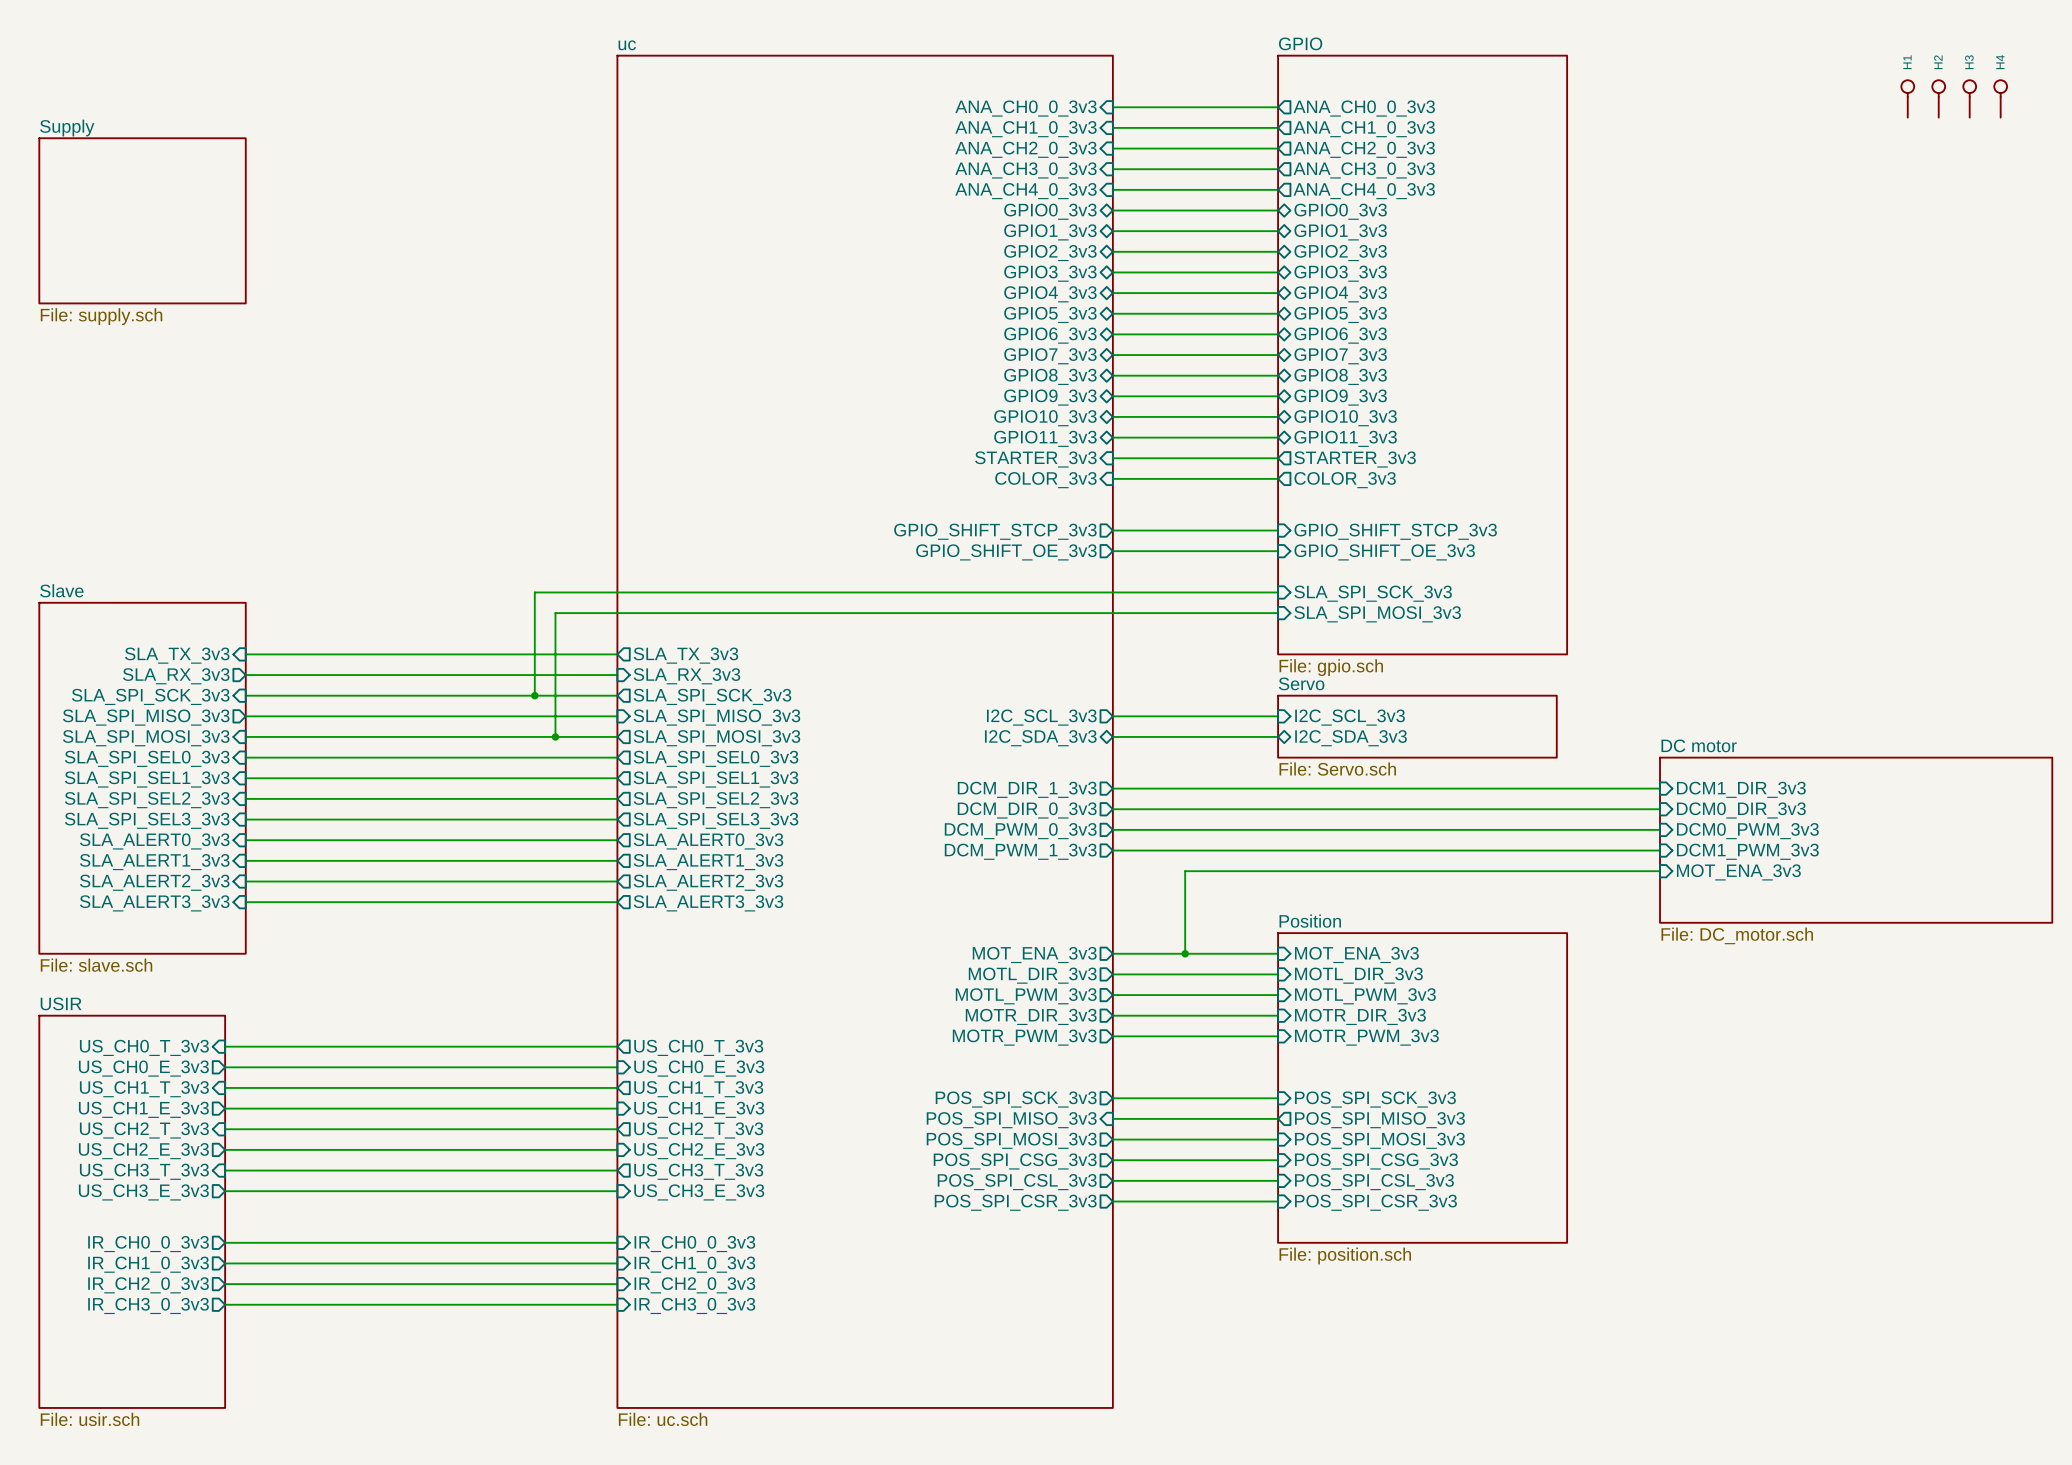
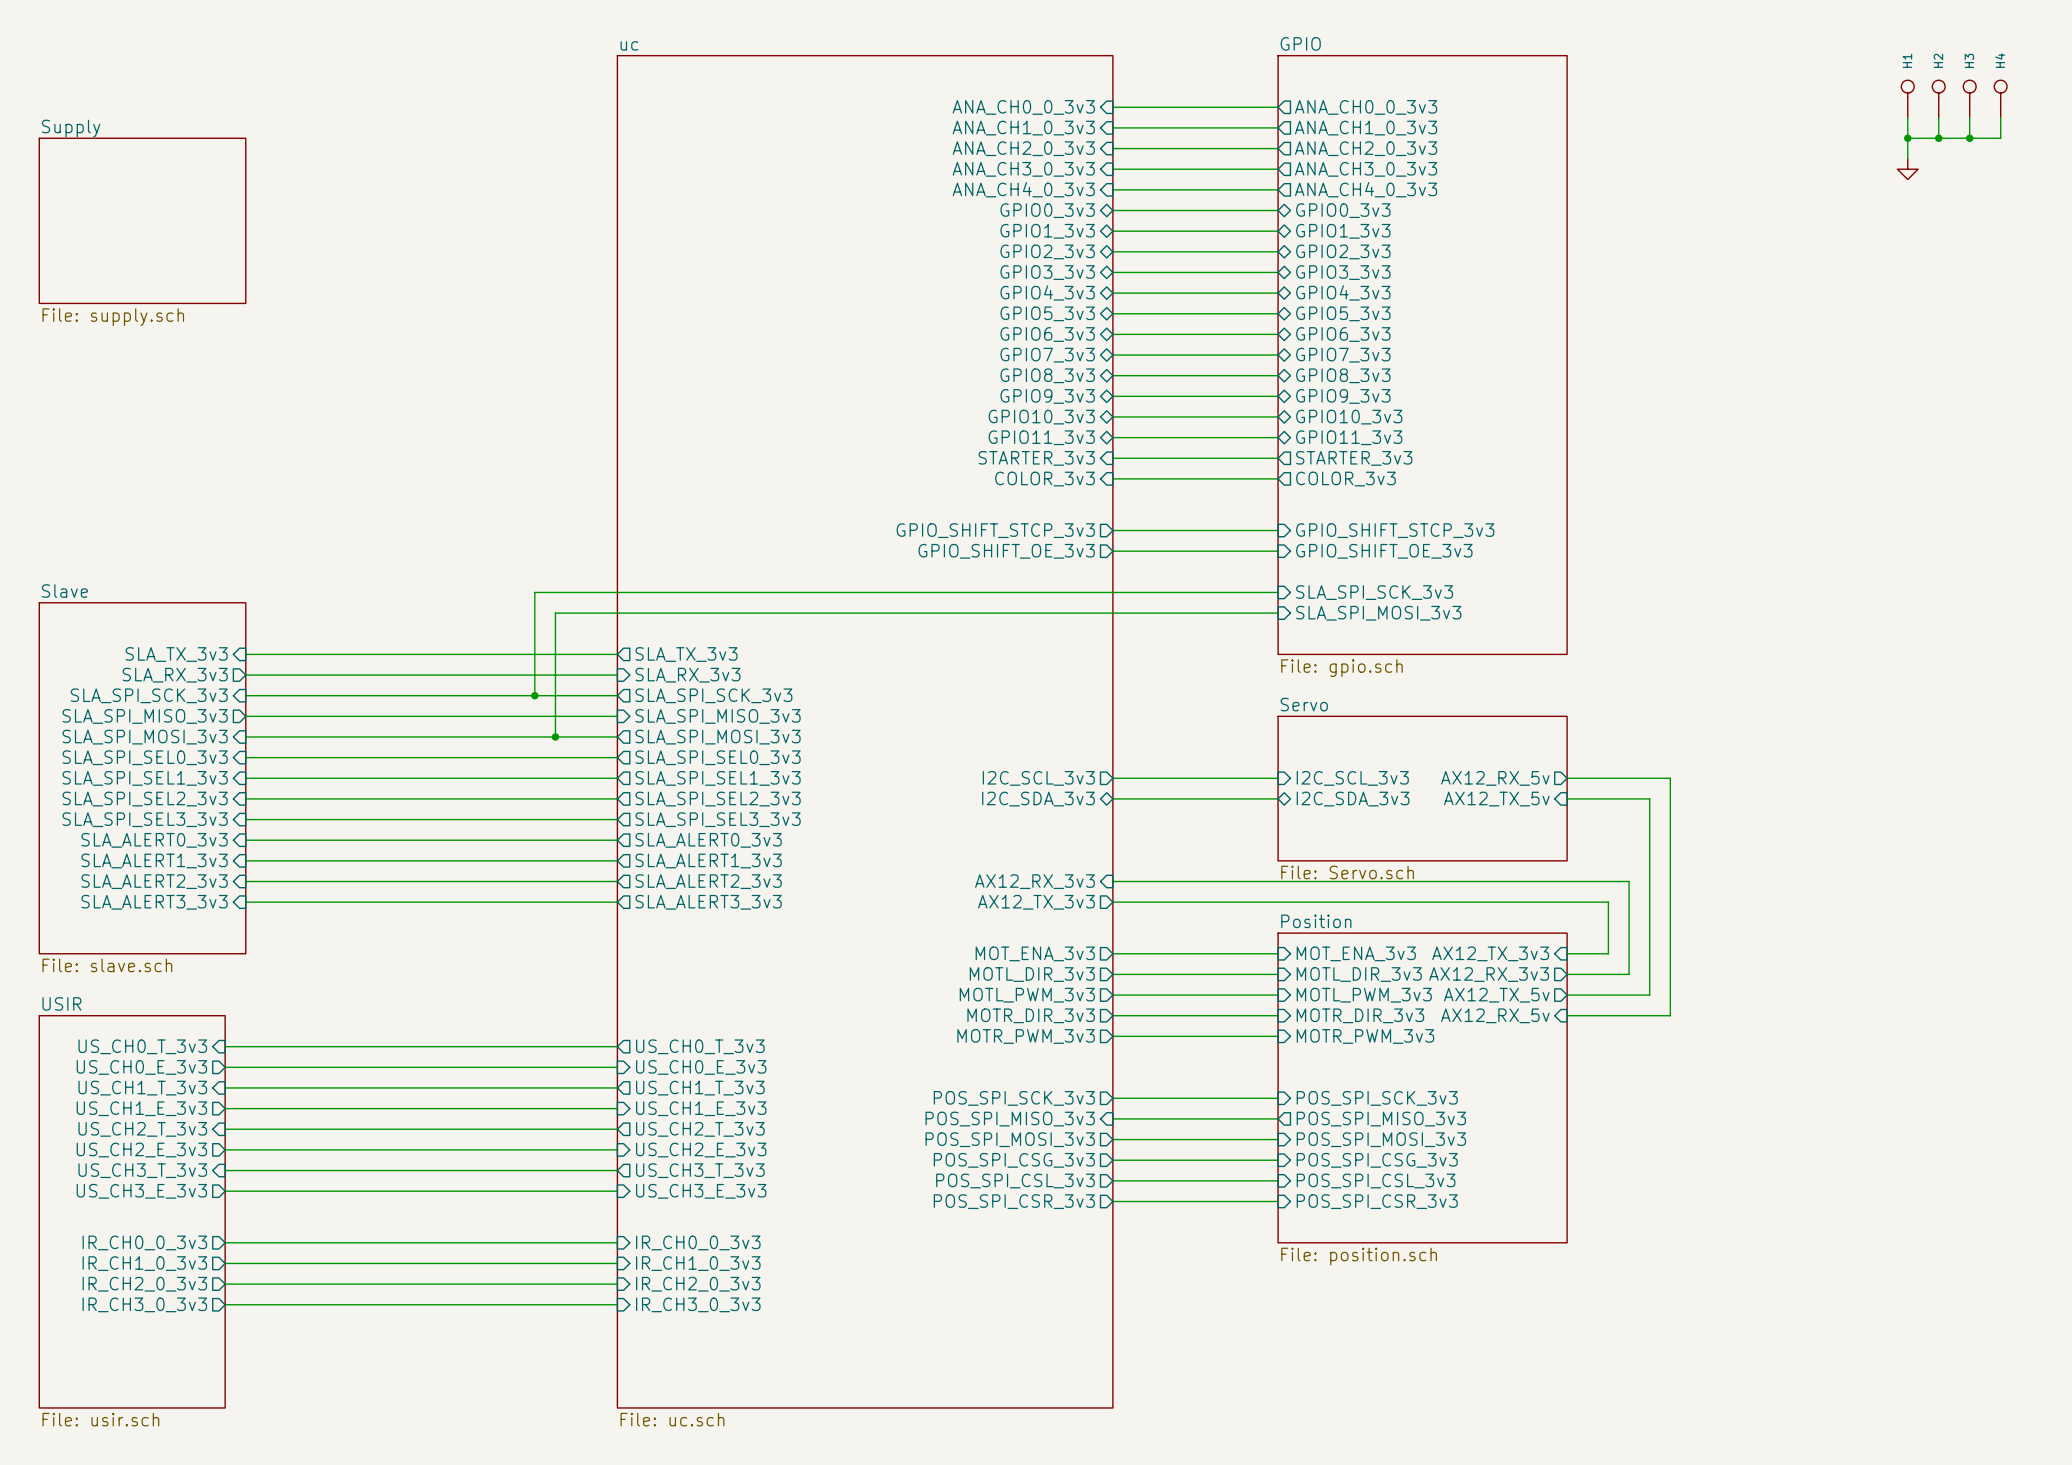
wire: none -> (1907, 117) (1907, 158)
wire: none -> (1938, 117) (1938, 138)
wire: none -> (1969, 117) (1969, 138)
wire: none -> (2000, 117) (2000, 138) (1907, 138)
junction: none -> (1907, 138)
junction: none -> (1938, 138)
junction: none -> (1969, 138)
power symbol: none -> (1907, 169)
wire: (1112, 716) (1278, 716) -> (1112, 778) (1278, 778)
sheet pin position: I2C_SCL_3v3 (1041, 717) -> I2C_SCL_3v3 (1038, 778)
sheet pin position: I2C_SCL_3v3 (1350, 717) -> I2C_SCL_3v3 (1352, 778)
sheet Servo: File: Servo.sch (1417, 726) -> none
wire: (1112, 736) (1278, 736) -> (1112, 798) (1278, 798)
sheet pin position: I2C_SDA_3v3 (1040, 738) -> I2C_SDA_3v3 (1038, 799)
sheet pin position: I2C_SDA_3v3 (1351, 738) -> I2C_SDA_3v3 (1353, 799)
wire: none -> (1567, 778) (1670, 778) (1670, 1015) (1567, 1015)
sheet pin: none -> AX12_RX_5v (1495, 778)
wire: (1112, 788) (1660, 788) -> none
sheet Servo: none -> File: Servo.sch (1422, 788)
sheet pin: DCM_DIR_1_3v3 (1027, 789) -> none
sheet pin: DCM1_DIR_3v3 (1741, 789) -> none
wire: none -> (1567, 798) (1649, 798) (1649, 995) (1567, 995)
sheet pin: none -> AX12_TX_5v (1496, 799)
wire: (1112, 809) (1660, 809) -> none
sheet pin: DCM_DIR_0_3v3 (1027, 810) -> none
sheet pin: DCM0_DIR_3v3 (1741, 810) -> none
wire: (1112, 829) (1660, 829) -> none
sheet pin: DCM_PWM_0_3v3 (1020, 831) -> none
sheet pin: DCM0_PWM_3v3 (1747, 831) -> none
sheet DC motor: File: DC_motor.sch (1856, 840) -> none
wire: (1112, 850) (1660, 850) -> none
sheet pin: DCM_PWM_1_3v3 (1020, 851) -> none
sheet pin: DCM1_PWM_3v3 (1747, 851) -> none
wire: (1660, 871) (1185, 871) (1185, 953) -> none
sheet pin: MOT_ENA_3v3 (1738, 872) -> none
wire: none -> (1112, 881) (1629, 881) (1629, 974) (1567, 974)
sheet pin: none -> AX12_RX_3v3 (1034, 881)
wire: none -> (1112, 902) (1608, 902) (1608, 953) (1567, 953)
sheet pin: none -> AX12_TX_3v3 (1036, 902)
junction: (1185, 953) -> none
sheet pin: none -> AX12_TX_3v3 (1490, 953)
sheet pin: none -> AX12_RX_3v3 (1489, 974)
sheet pin: none -> AX12_TX_5v (1496, 995)
sheet pin: none -> AX12_RX_5v (1495, 1015)

